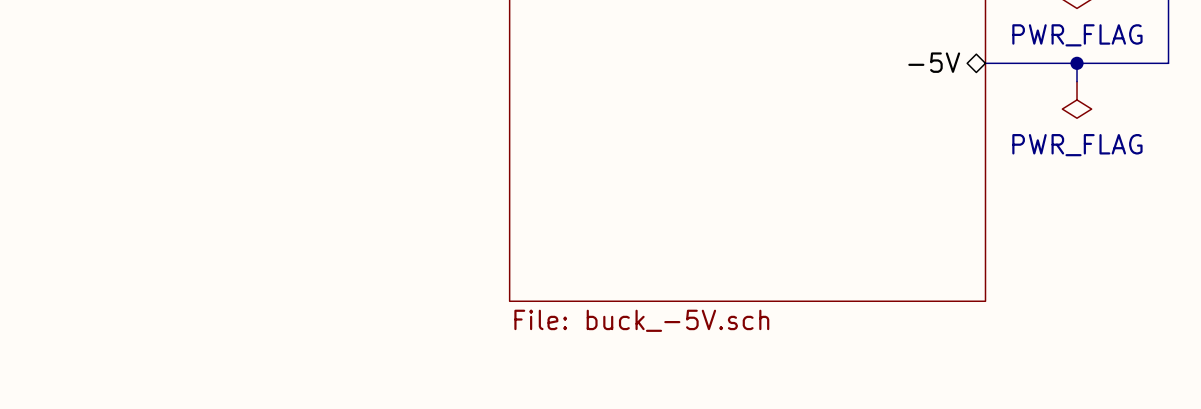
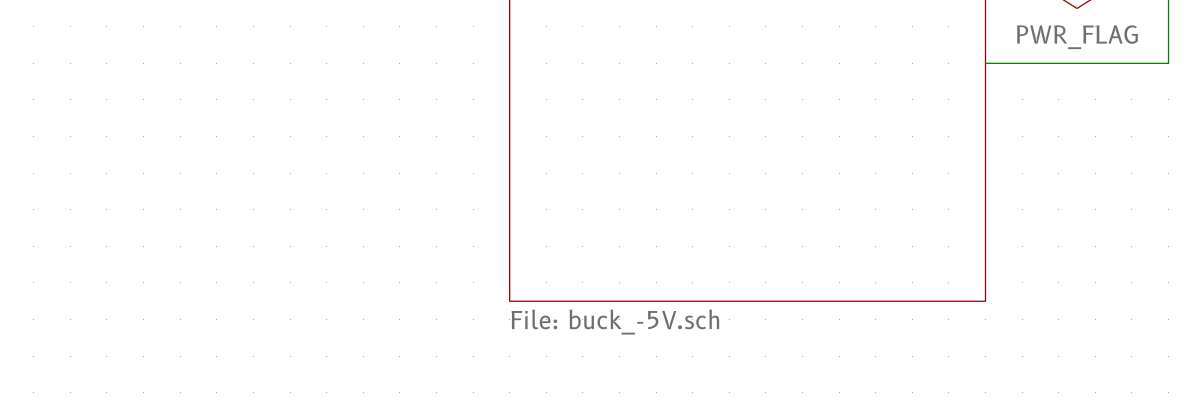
sheet pin: -5V (934, 62) -> none
wire: (1077, 63) (1077, 81) -> none
junction: (1077, 63) -> none
power symbol: PWR_FLAG (1077, 99) -> none

